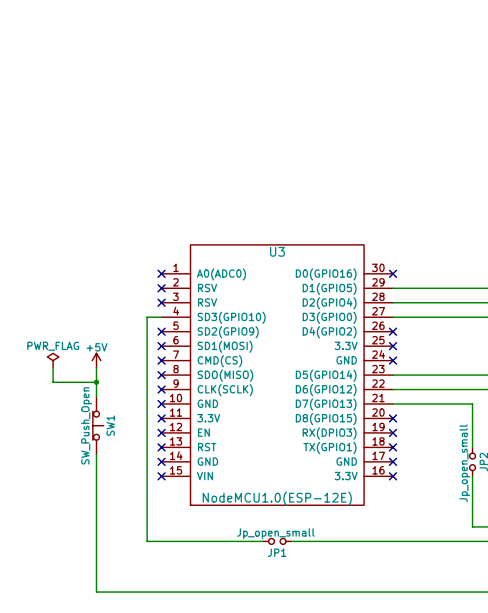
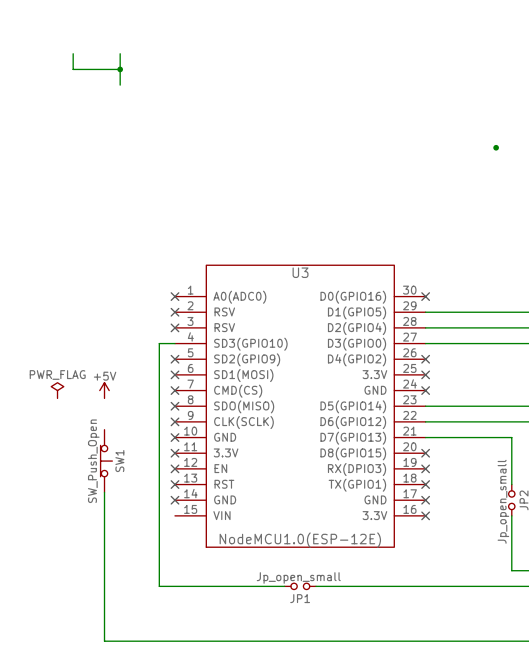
wire: none -> (73, 53) (73, 69) (120, 69)
wire: none -> (120, 53) (120, 85)
junction: none -> (120, 69)
junction: none -> (496, 147)
wire: (53, 367) (53, 382) (96, 382) -> none
wire: (96, 367) (96, 396) -> none
junction: (96, 382) -> none
no-connect mark: (161, 476) -> none

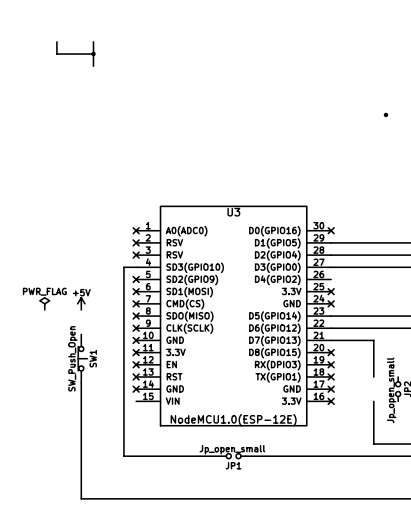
no-connect mark: (425, 359) -> none
wire: (480, 437) (511, 437) (511, 484) -> (373, 340) (373, 376)
wire: (511, 515) (511, 570) -> (373, 401) (373, 444) (398, 444)

